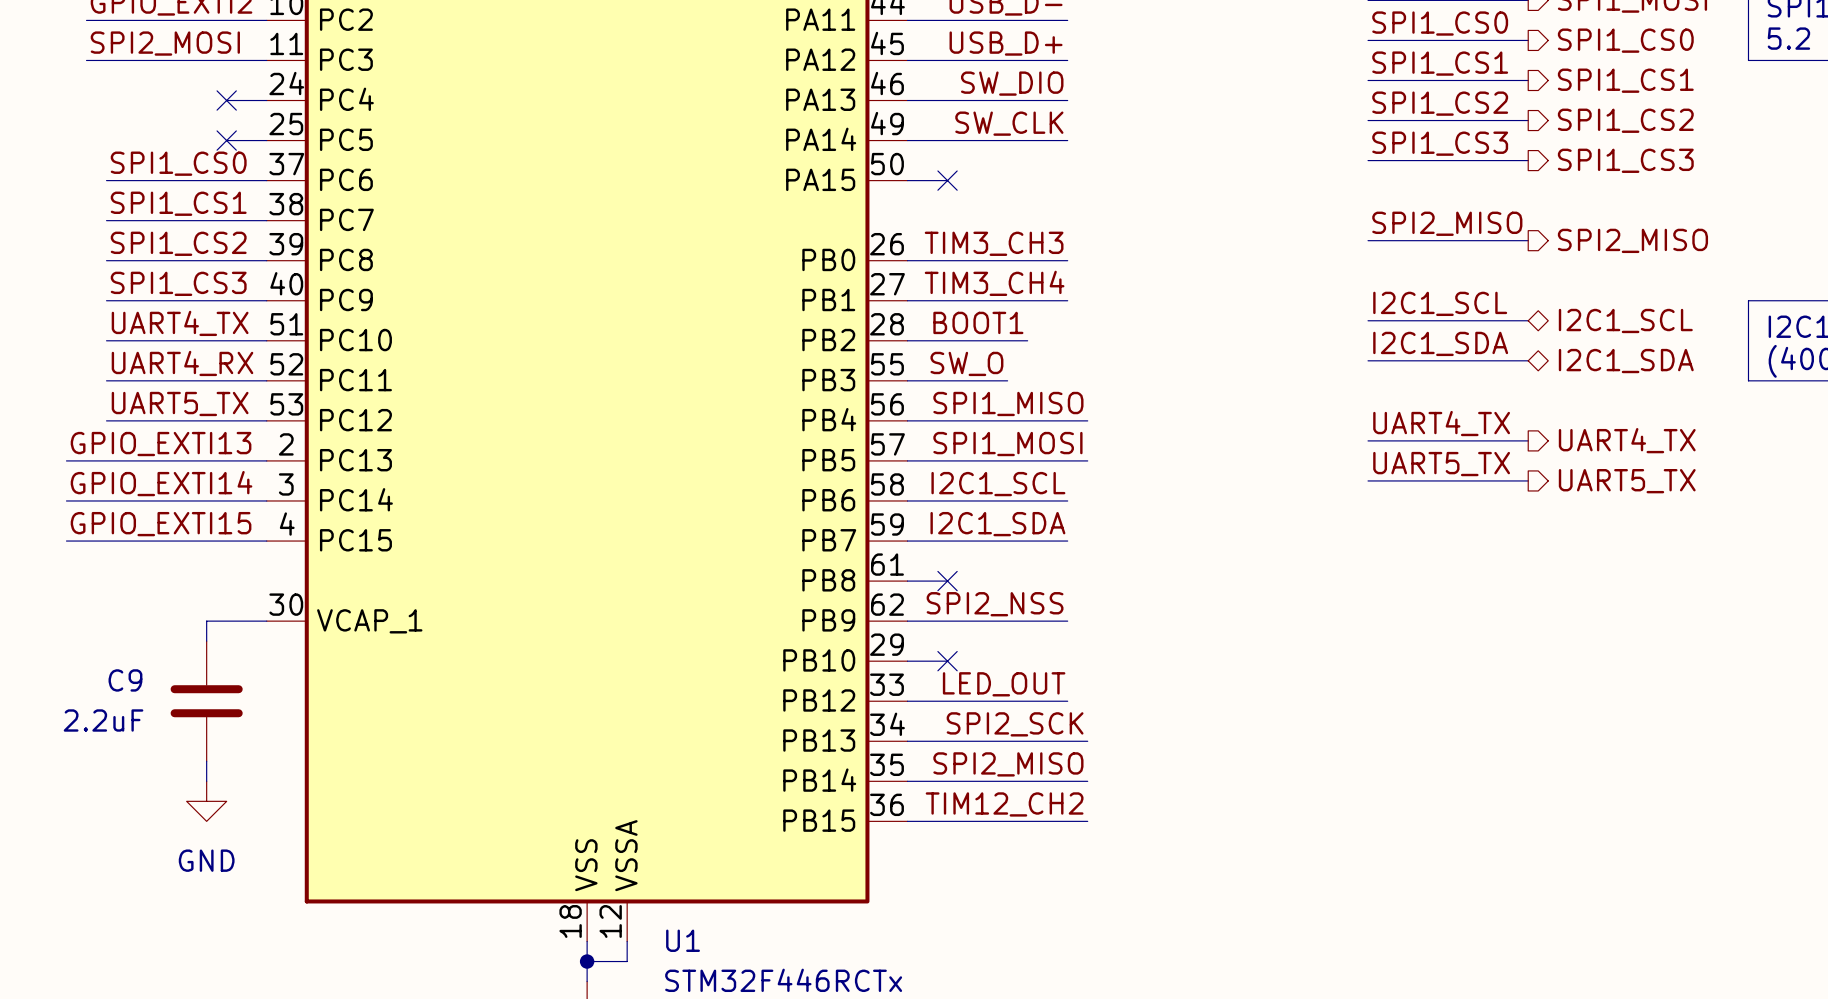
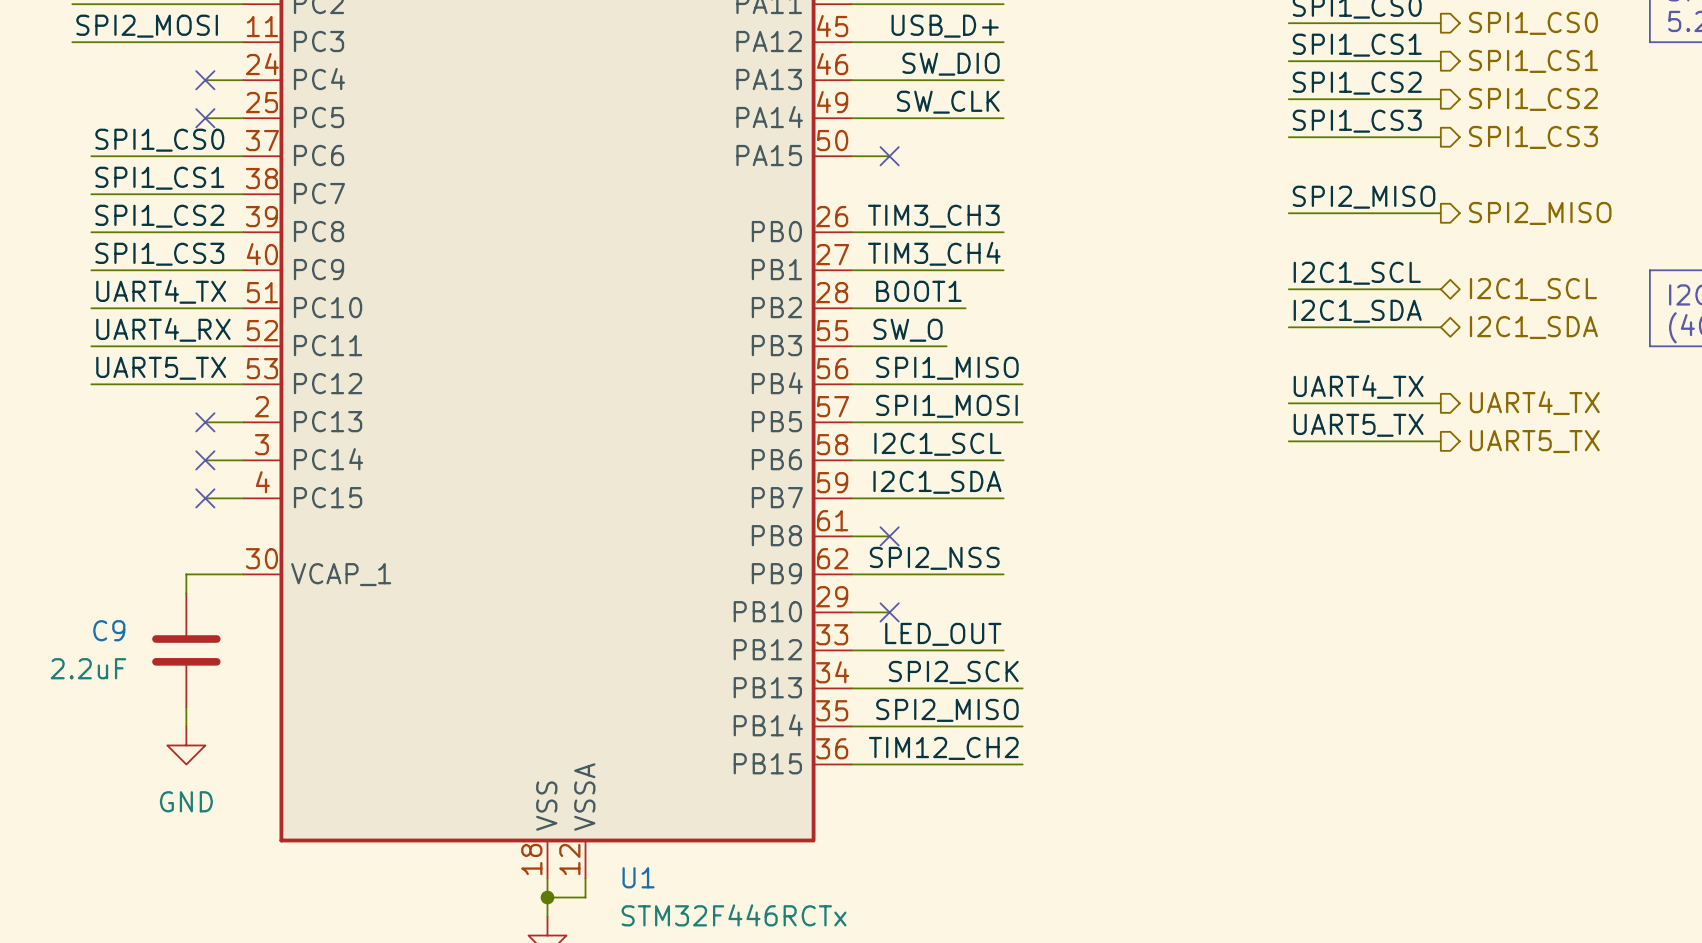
label: GPIO_EXTI13 (161, 444) -> none
wire: (66, 460) (226, 460) -> none
no-connect mark: none -> (205, 422)
label: GPIO_EXTI14 (161, 483) -> none
wire: (66, 500) (226, 500) -> none
no-connect mark: none -> (205, 460)
label: GPIO_EXTI15 (161, 524) -> none
wire: (66, 541) (226, 541) -> none
no-connect mark: none -> (205, 498)

